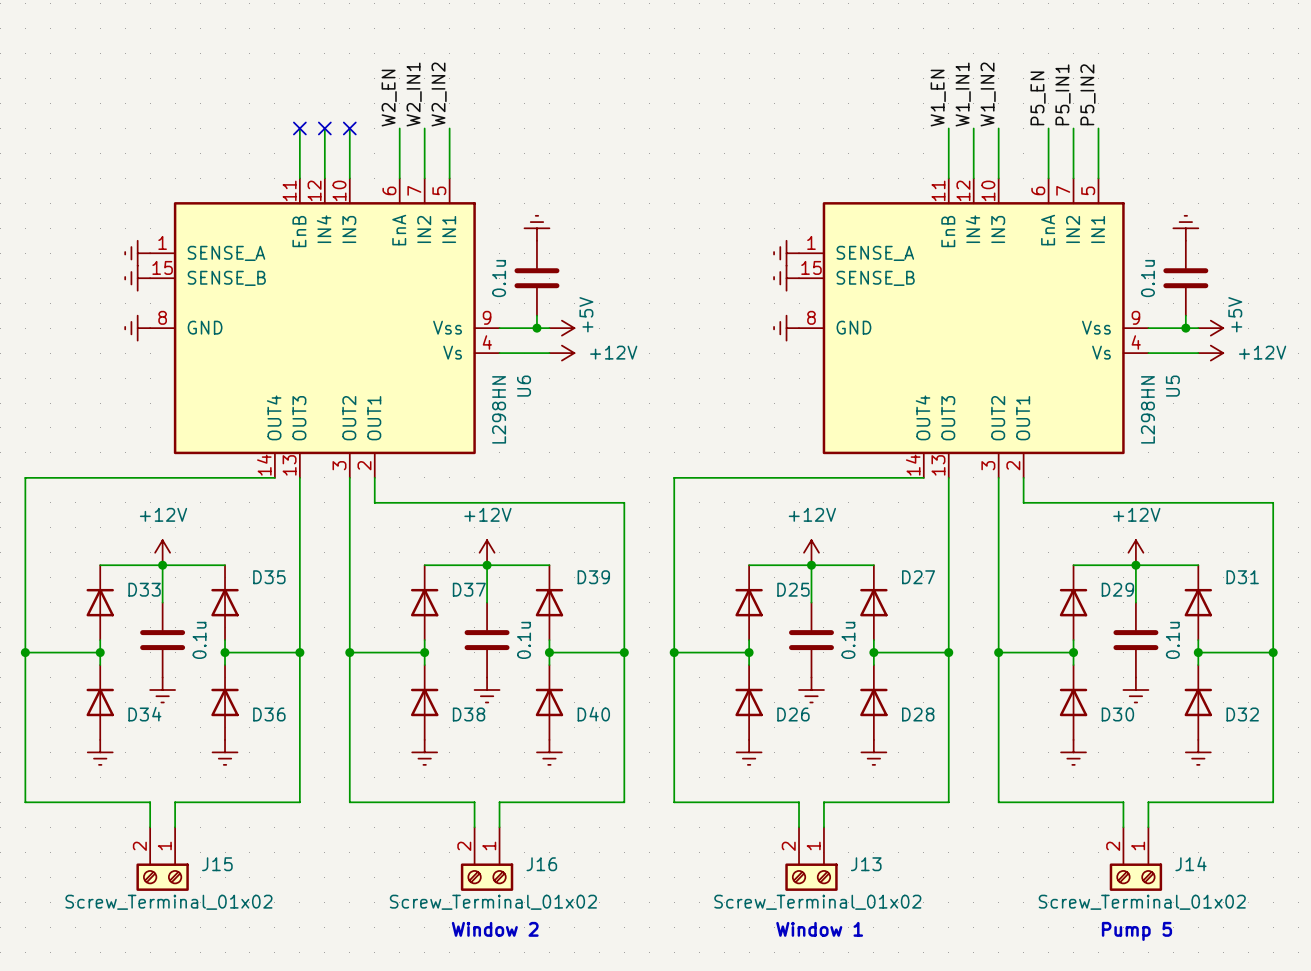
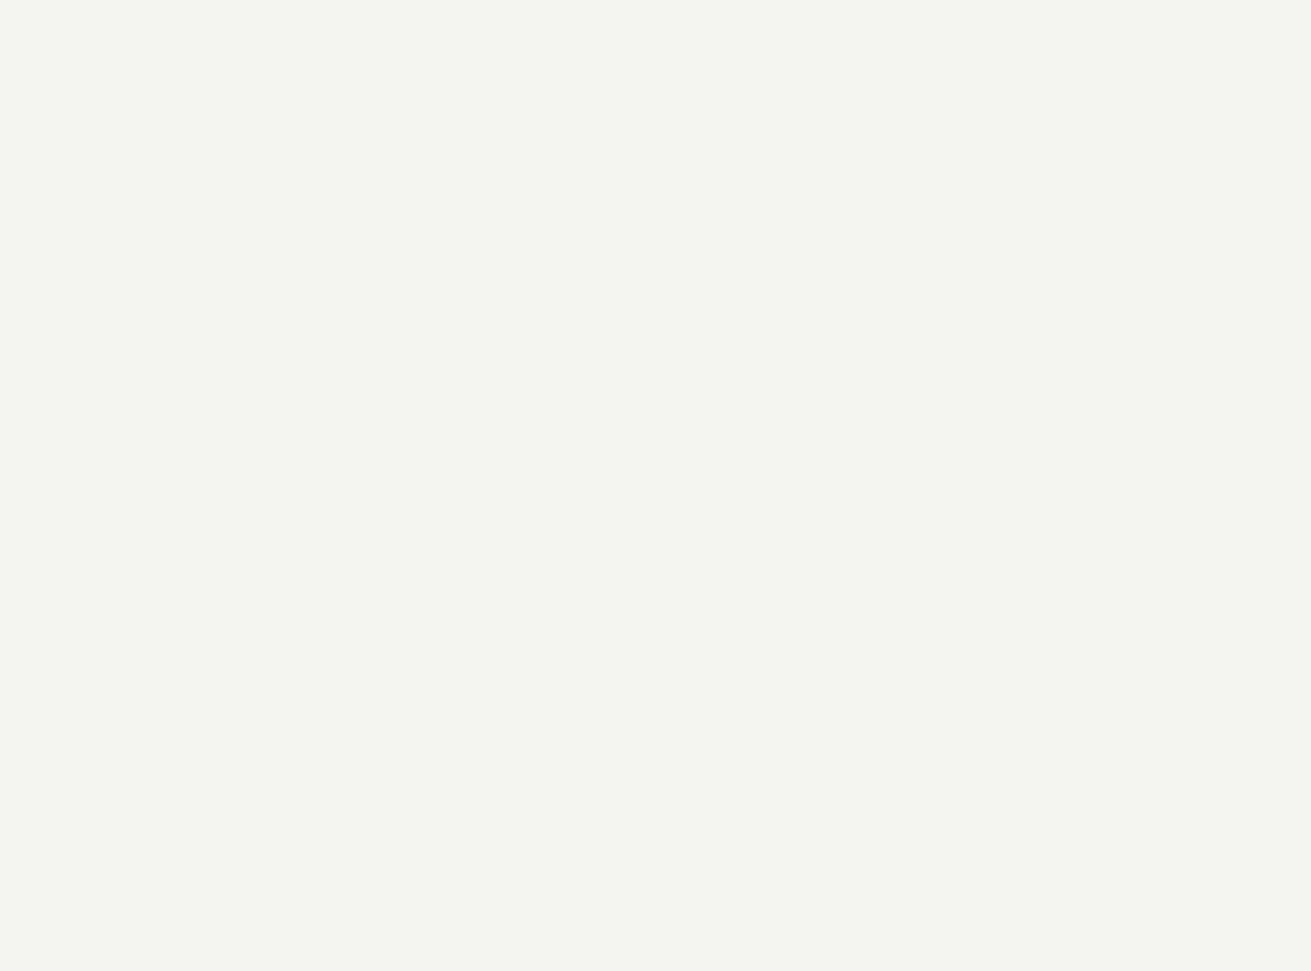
label: W2_IN1 (414, 94) -> none
label: W2_IN2 (439, 94) -> none
label: W1_IN1 (963, 94) -> none
label: W1_IN2 (988, 94) -> none
label: P5_IN1 (1062, 94) -> none
label: P5_IN2 (1087, 94) -> none
label: W2_EN (389, 98) -> none
label: W1_EN (938, 98) -> none
label: P5_EN (1038, 98) -> none
wire: (299, 128) (299, 178) -> none
no-connect mark: (299, 128) -> none
wire: (324, 128) (324, 178) -> none
no-connect mark: (324, 128) -> none
wire: (349, 128) (349, 178) -> none
no-connect mark: (349, 128) -> none
wire: (399, 128) (399, 178) -> none
wire: (424, 128) (424, 178) -> none
wire: (449, 128) (449, 178) -> none
wire: (948, 128) (948, 178) -> none
wire: (973, 128) (973, 178) -> none
wire: (998, 128) (998, 178) -> none
wire: (1048, 128) (1048, 178) -> none
wire: (1073, 128) (1073, 178) -> none
wire: (1098, 128) (1098, 178) -> none
power symbol: (536, 228) -> none
power symbol: (1185, 228) -> none
power symbol: (137, 253) -> none
power symbol: (786, 253) -> none
power symbol: (137, 278) -> none
part: 0.1u (536, 278) -> none
power symbol: (786, 278) -> none
part: 0.1u (1185, 278) -> none
wire: (536, 315) (536, 328) -> none
wire: (1185, 315) (1185, 328) -> none
power symbol: (137, 328) -> none
U6: L298HN (324, 328) -> none
wire: (499, 328) (549, 328) -> none
junction: (536, 328) -> none
power symbol: +5V (561, 328) -> none
power symbol: (786, 328) -> none
U5: L298HN (973, 328) -> none
wire: (1148, 328) (1198, 328) -> none
junction: (1185, 328) -> none
power symbol: +5V (1210, 328) -> none
wire: (499, 353) (549, 353) -> none
power symbol: +12V (561, 353) -> none
wire: (1148, 353) (1198, 353) -> none
power symbol: +12V (1210, 353) -> none
wire: (274, 477) (25, 477) (25, 802) (150, 802) (150, 827) -> none
wire: (299, 477) (299, 802) (175, 802) (175, 827) -> none
wire: (349, 477) (349, 802) (474, 802) (474, 827) -> none
wire: (374, 477) (374, 502) (624, 502) (624, 802) (499, 802) (499, 827) -> none
wire: (923, 477) (674, 477) (674, 802) (799, 802) (799, 827) -> none
wire: (948, 477) (948, 802) (823, 802) (823, 827) -> none
wire: (998, 477) (998, 802) (1123, 802) (1123, 827) -> none
wire: (1023, 477) (1023, 502) (1273, 502) (1273, 802) (1148, 802) (1148, 827) -> none
power symbol: +12V (162, 552) -> none
power symbol: +12V (487, 552) -> none
power symbol: +12V (811, 552) -> none
power symbol: +12V (1135, 552) -> none
wire: (100, 565) (225, 565) -> none
wire: (162, 565) (162, 602) -> none
junction: (162, 565) -> none
wire: (424, 565) (549, 565) -> none
wire: (487, 565) (487, 602) -> none
junction: (487, 565) -> none
wire: (749, 565) (873, 565) -> none
wire: (811, 565) (811, 602) -> none
junction: (811, 565) -> none
wire: (1073, 565) (1198, 565) -> none
wire: (1135, 565) (1135, 602) -> none
junction: (1135, 565) -> none
D33: (100, 602) -> none
D35: (225, 602) -> none
D37: (424, 602) -> none
D39: (549, 602) -> none
D25: (749, 602) -> none
D27: (873, 602) -> none
D29: (1073, 602) -> none
D31: (1198, 602) -> none
wire: (100, 640) (100, 665) -> none
part: 0.1u (162, 640) -> none
wire: (225, 640) (225, 665) -> none
wire: (424, 640) (424, 665) -> none
part: 0.1u (487, 640) -> none
wire: (549, 640) (549, 665) -> none
wire: (749, 640) (749, 665) -> none
part: 0.1u (811, 640) -> none
wire: (873, 640) (873, 665) -> none
wire: (1073, 640) (1073, 665) -> none
part: 0.1u (1135, 640) -> none
wire: (1198, 640) (1198, 665) -> none
wire: (25, 652) (100, 652) -> none
junction: (25, 652) -> none
junction: (100, 652) -> none
wire: (225, 652) (299, 652) -> none
junction: (225, 652) -> none
junction: (299, 652) -> none
wire: (349, 652) (424, 652) -> none
junction: (349, 652) -> none
junction: (424, 652) -> none
wire: (549, 652) (624, 652) -> none
junction: (549, 652) -> none
junction: (624, 652) -> none
wire: (674, 652) (749, 652) -> none
junction: (674, 652) -> none
junction: (749, 652) -> none
wire: (873, 652) (948, 652) -> none
junction: (873, 652) -> none
junction: (948, 652) -> none
wire: (998, 652) (1073, 652) -> none
junction: (998, 652) -> none
junction: (1073, 652) -> none
wire: (1198, 652) (1273, 652) -> none
junction: (1198, 652) -> none
junction: (1273, 652) -> none
power symbol: (162, 690) -> none
power symbol: (487, 690) -> none
power symbol: (811, 690) -> none
power symbol: (1135, 690) -> none
D34: (100, 702) -> none
D36: (225, 702) -> none
D38: (424, 702) -> none
D40: (549, 702) -> none
D26: (749, 702) -> none
D28: (873, 702) -> none
D30: (1073, 702) -> none
D32: (1198, 702) -> none
power symbol: (100, 752) -> none
power symbol: (225, 752) -> none
power symbol: (424, 752) -> none
power symbol: (549, 752) -> none
power symbol: (749, 752) -> none
power symbol: (873, 752) -> none
power symbol: (1073, 752) -> none
power symbol: (1198, 752) -> none
J15: Screw_Terminal_01x02 (162, 859) -> none
J16: Screw_Terminal_01x02 (487, 859) -> none
J13: Screw_Terminal_01x02 (811, 859) -> none
J14: Screw_Terminal_01x02 (1135, 859) -> none
text: Window 2 (495, 929) -> none
text: Window 1 (819, 929) -> none
text: Pump 5 (1136, 931) -> none

